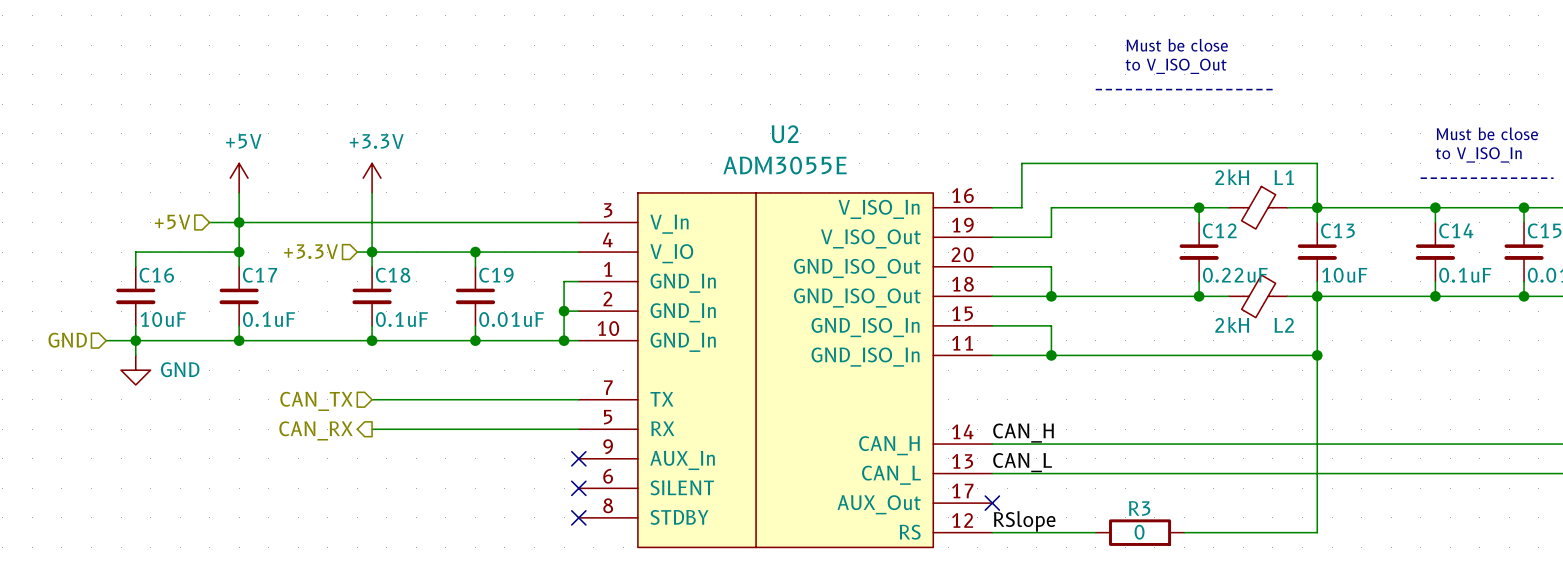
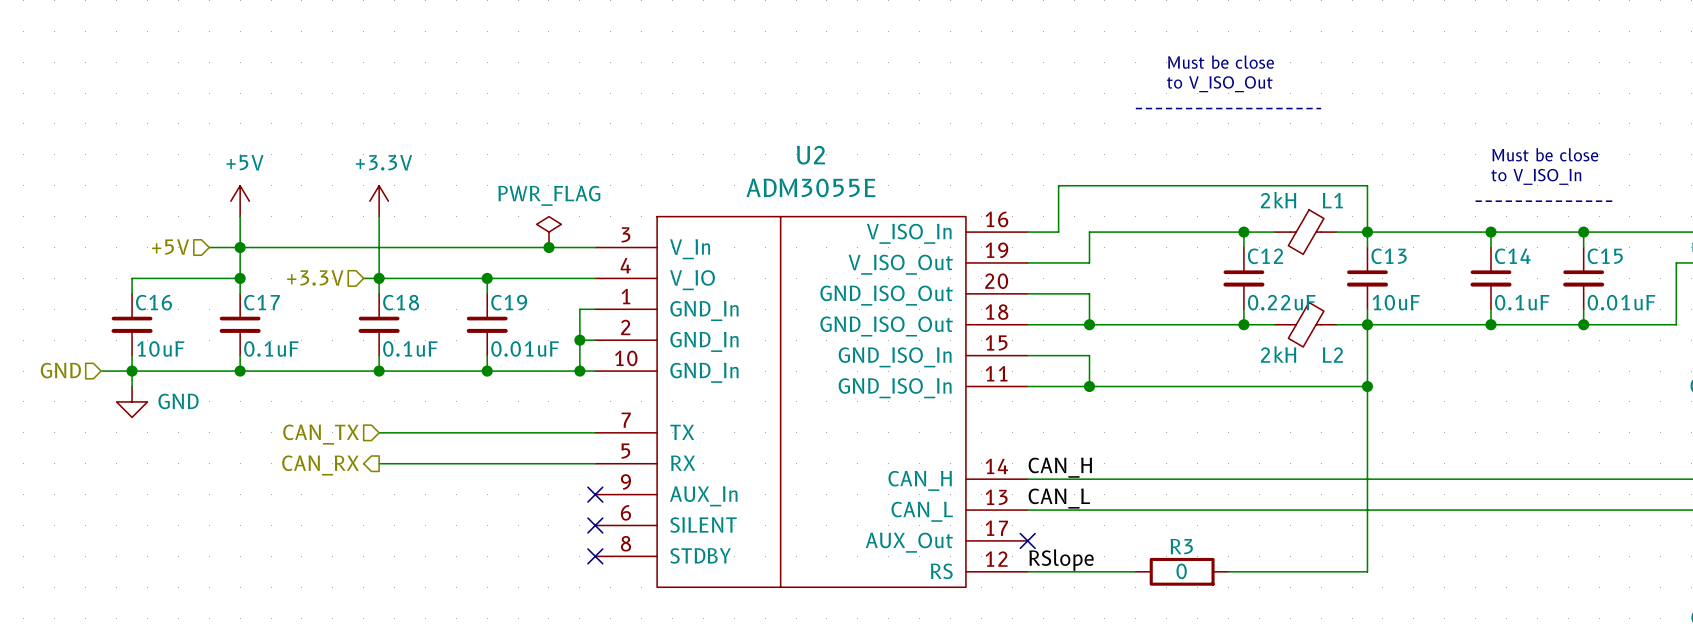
U2 symbol: [578, 192, 993, 548] -> [595, 216, 1028, 588]
power symbol: none -> PWR_FLAG (548, 232)
junction: none -> (548, 247)

